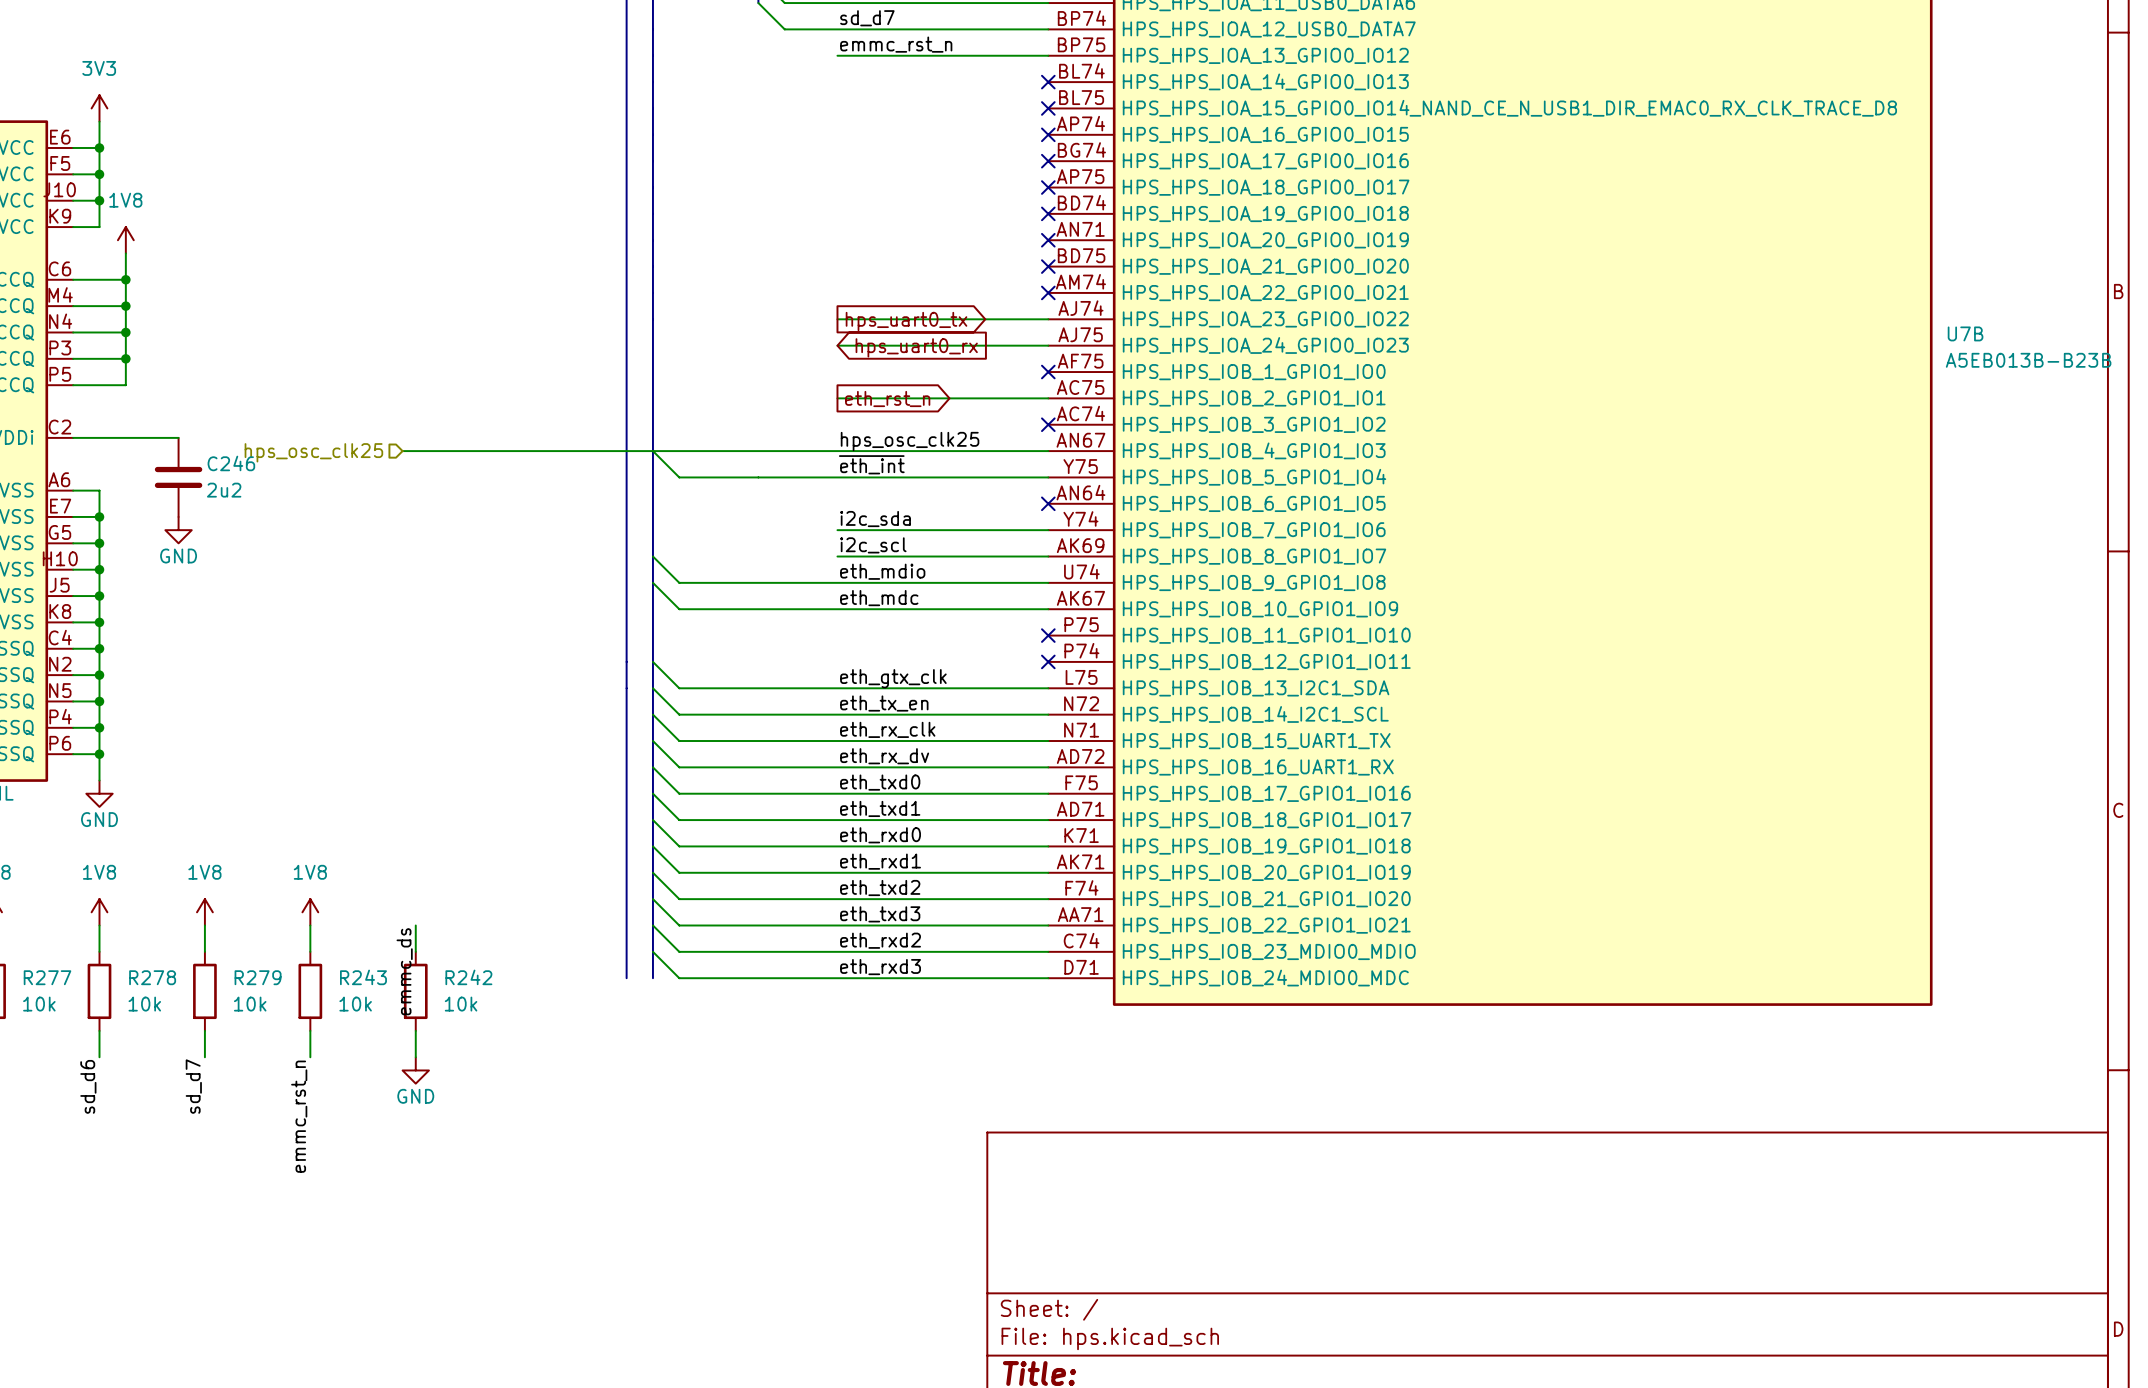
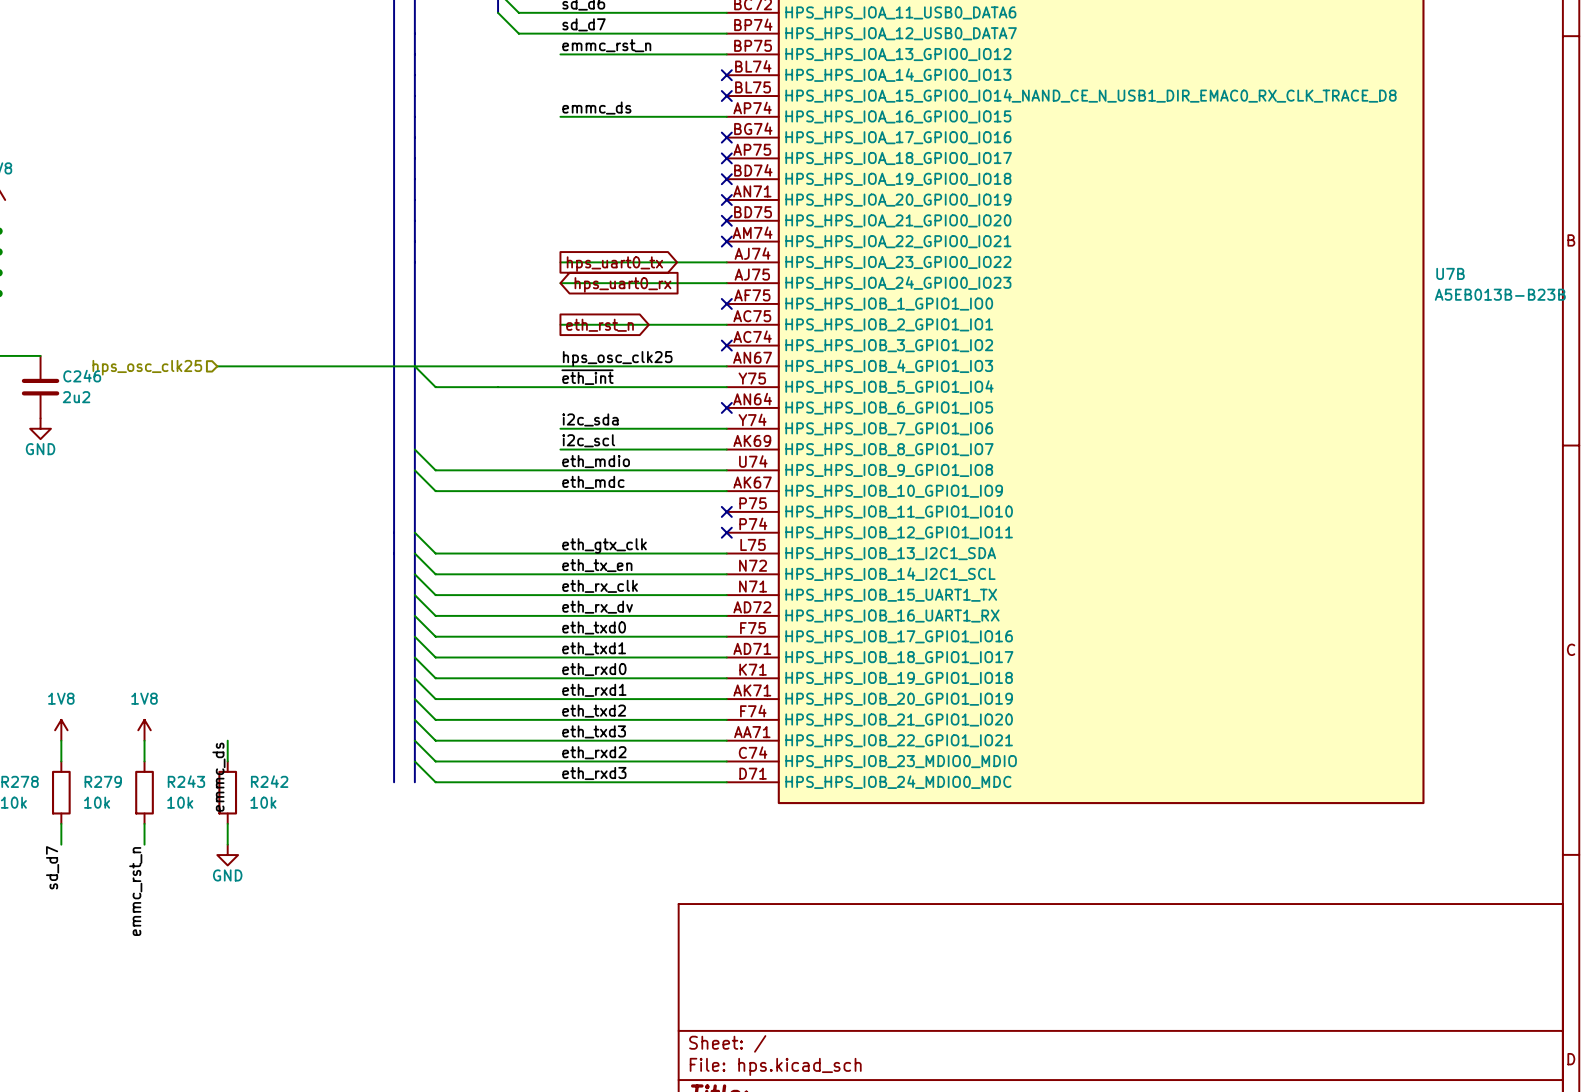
label: none -> emmc_ds (596, 108)
wire: none -> (560, 116) (726, 116)
no-connect mark: (1048, 134) -> none

